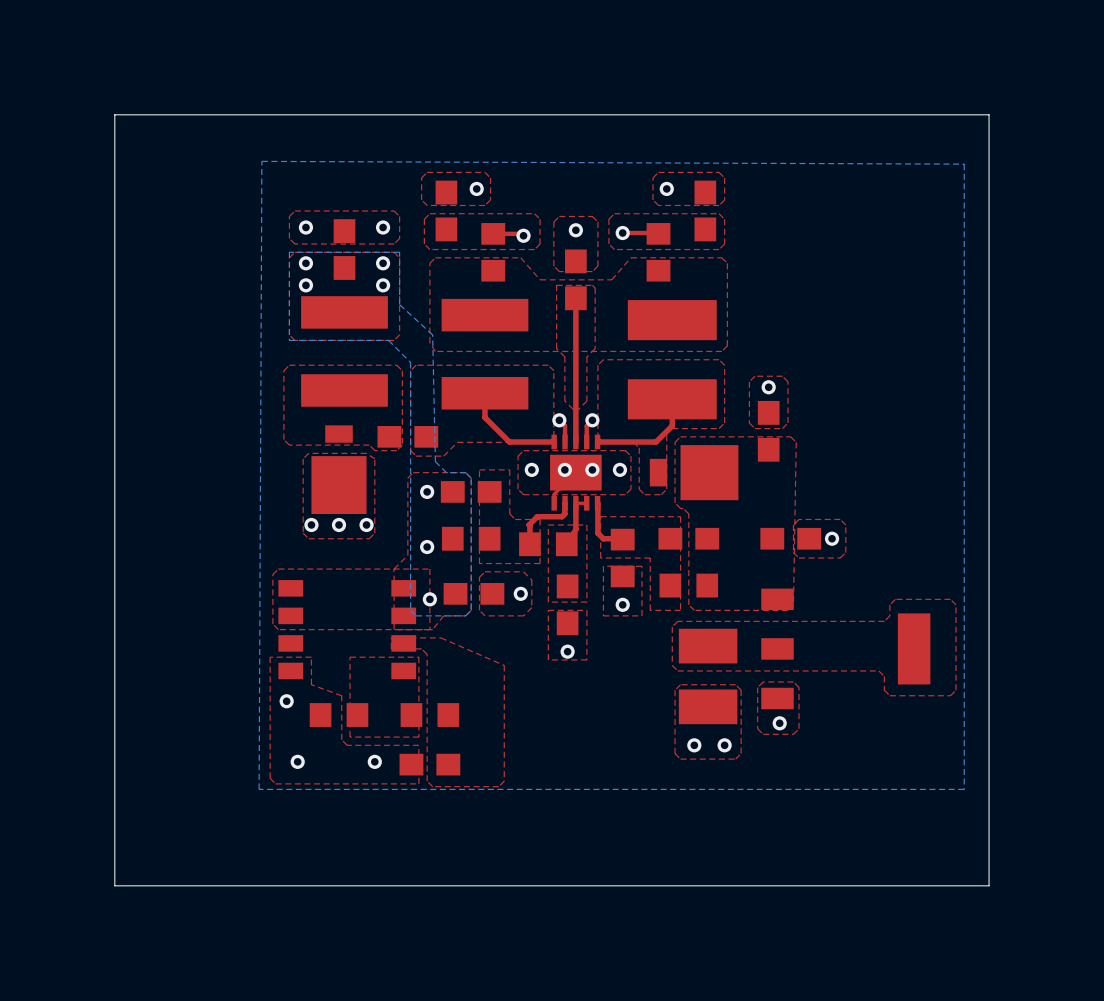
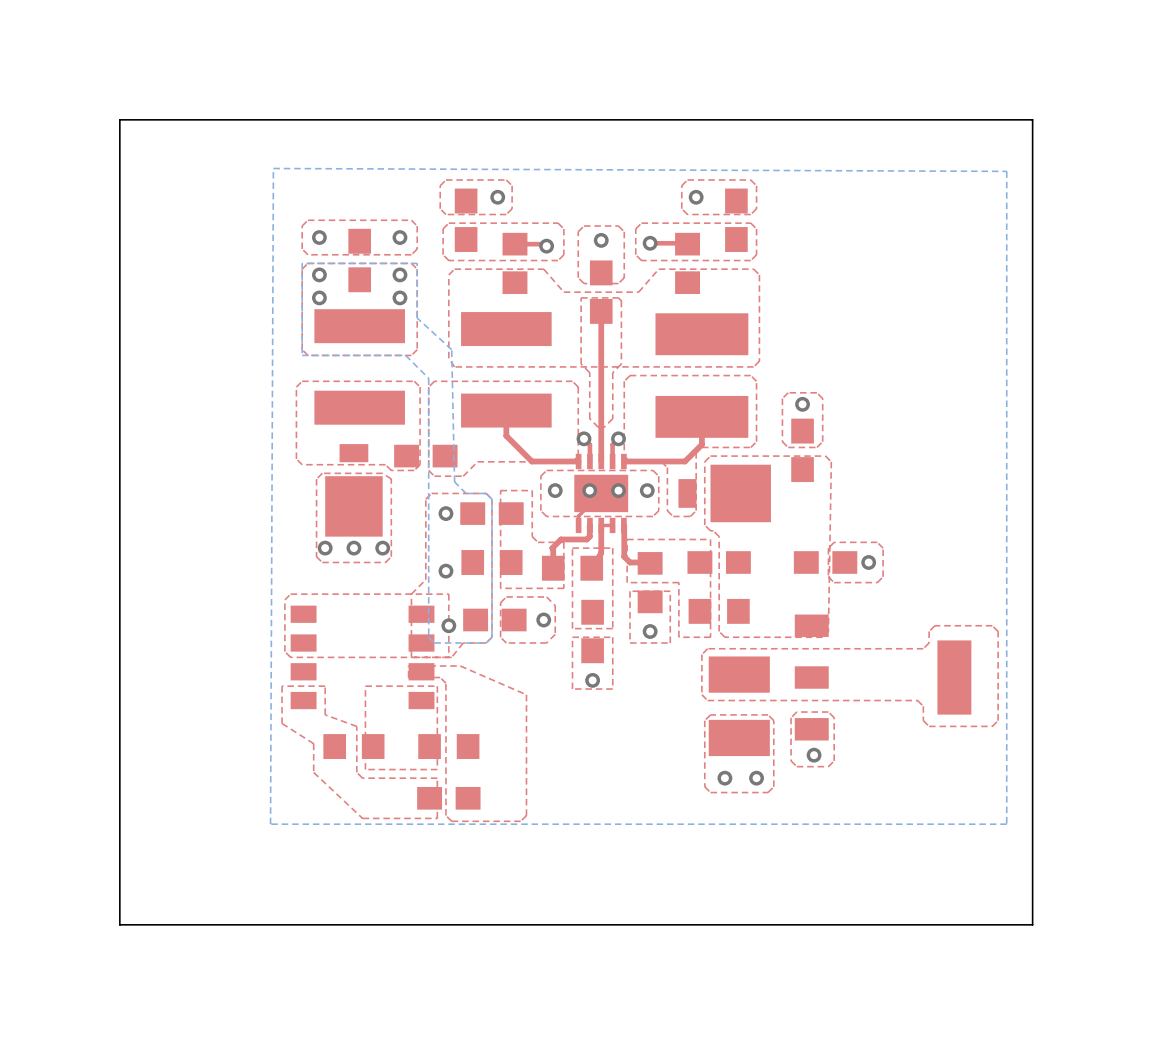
top zone outline: (270, 693) (270, 778) (275, 783) (347, 783) -> (282, 723) (313, 743) (313, 772) (362, 818)
via: (286, 701) -> none
via: (297, 761) -> none
via: (374, 761) -> none

